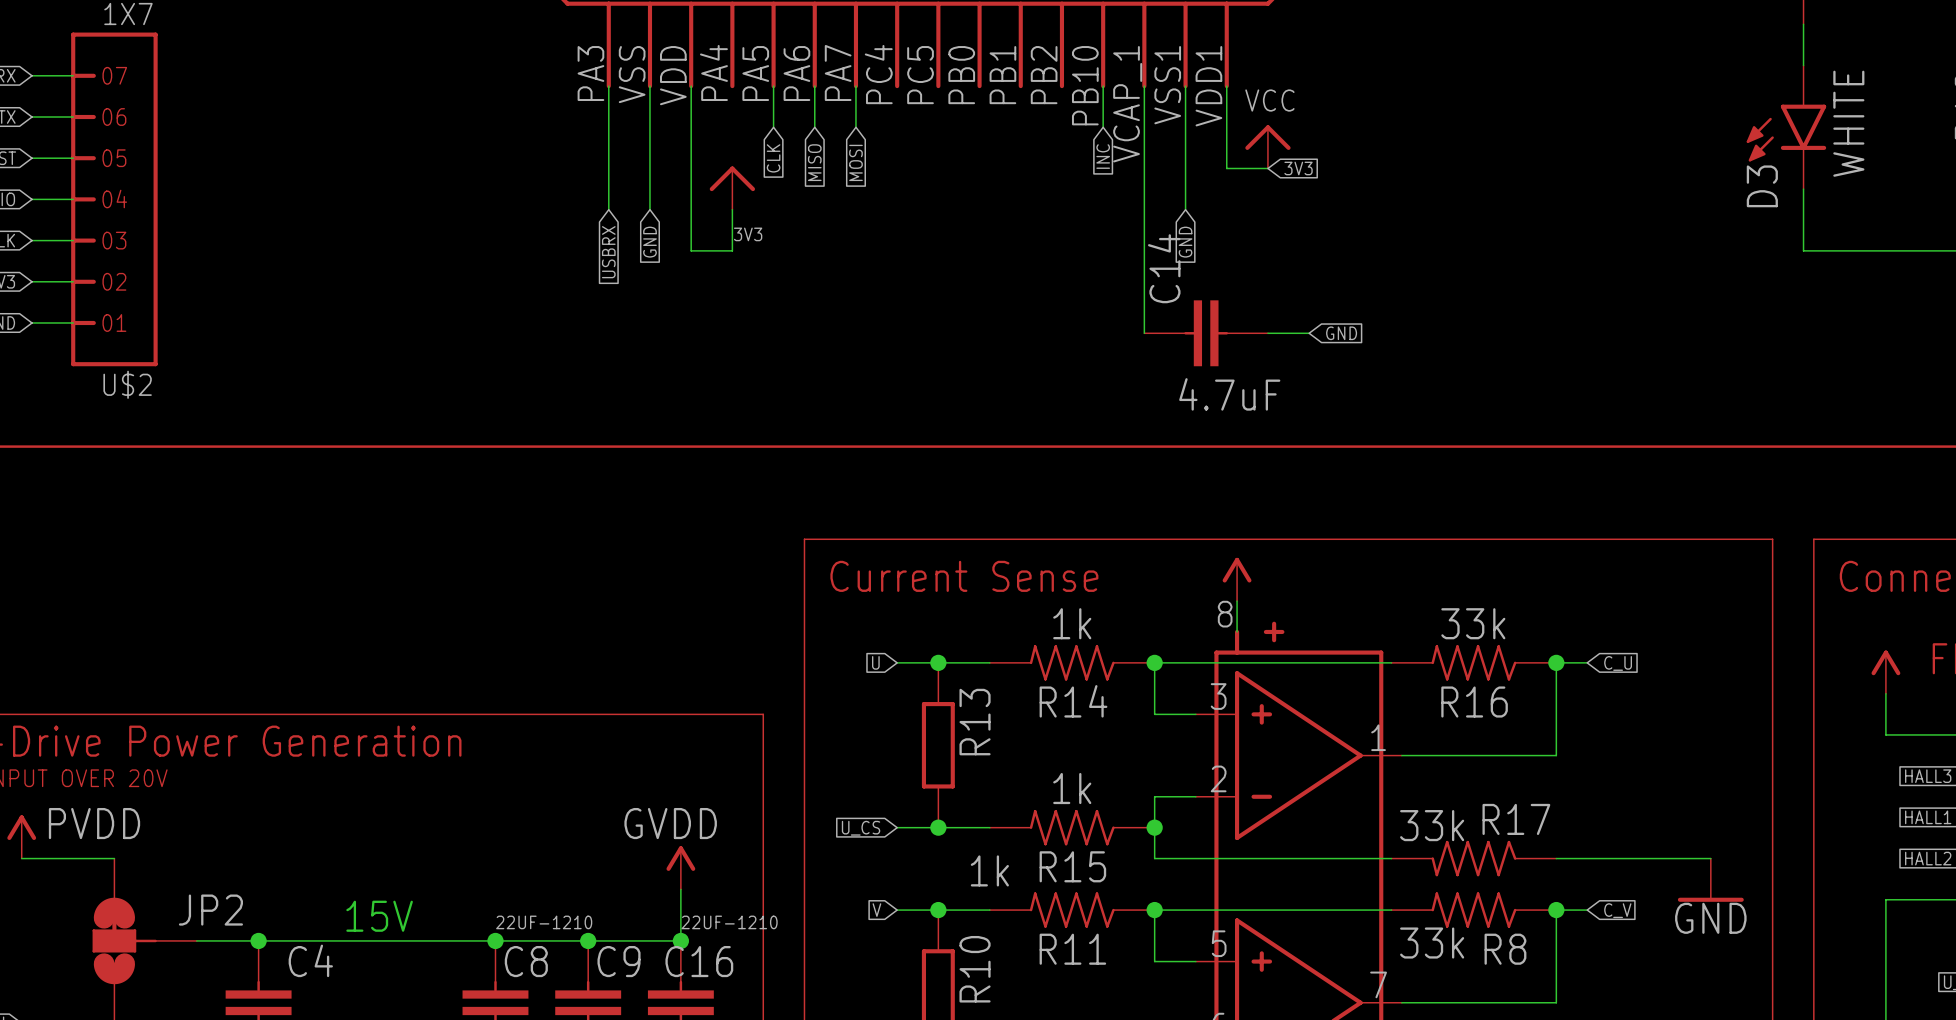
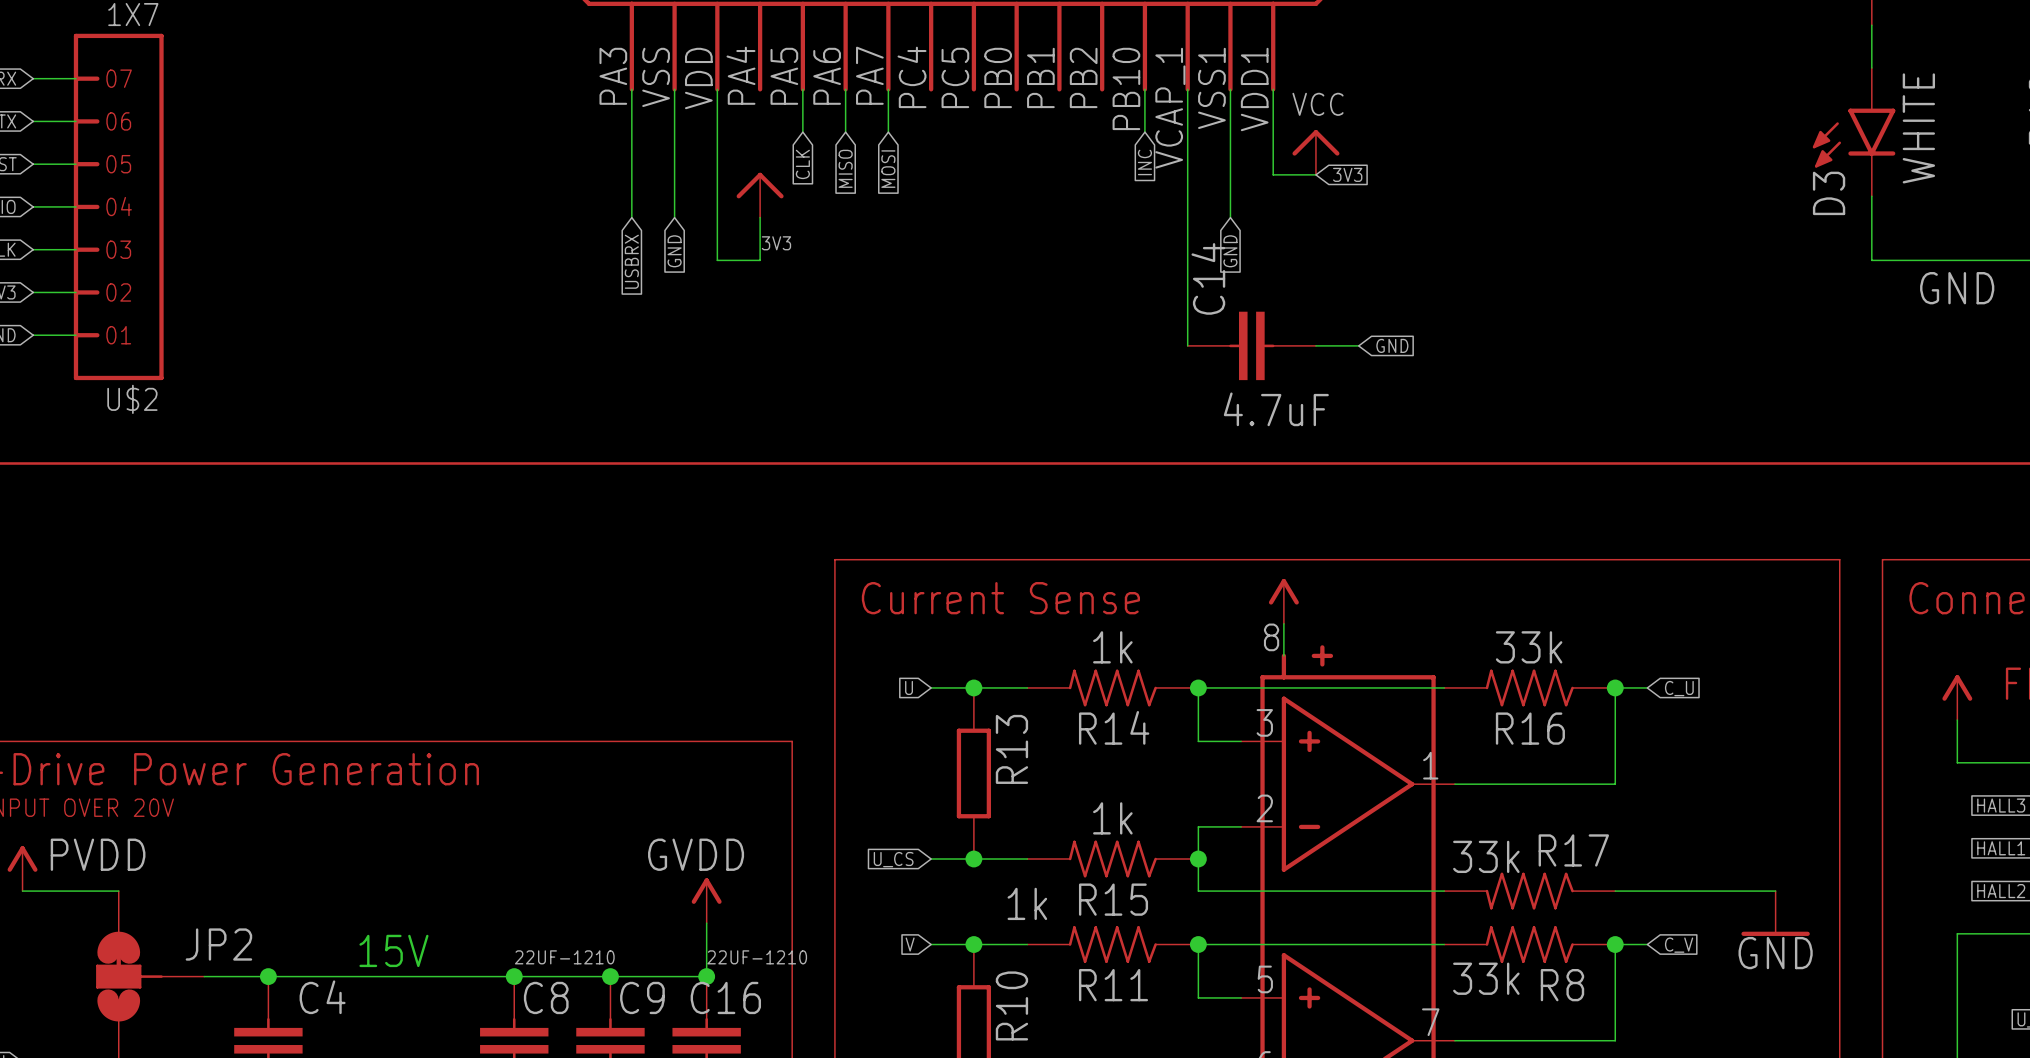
label: none -> GND (1957, 288)

